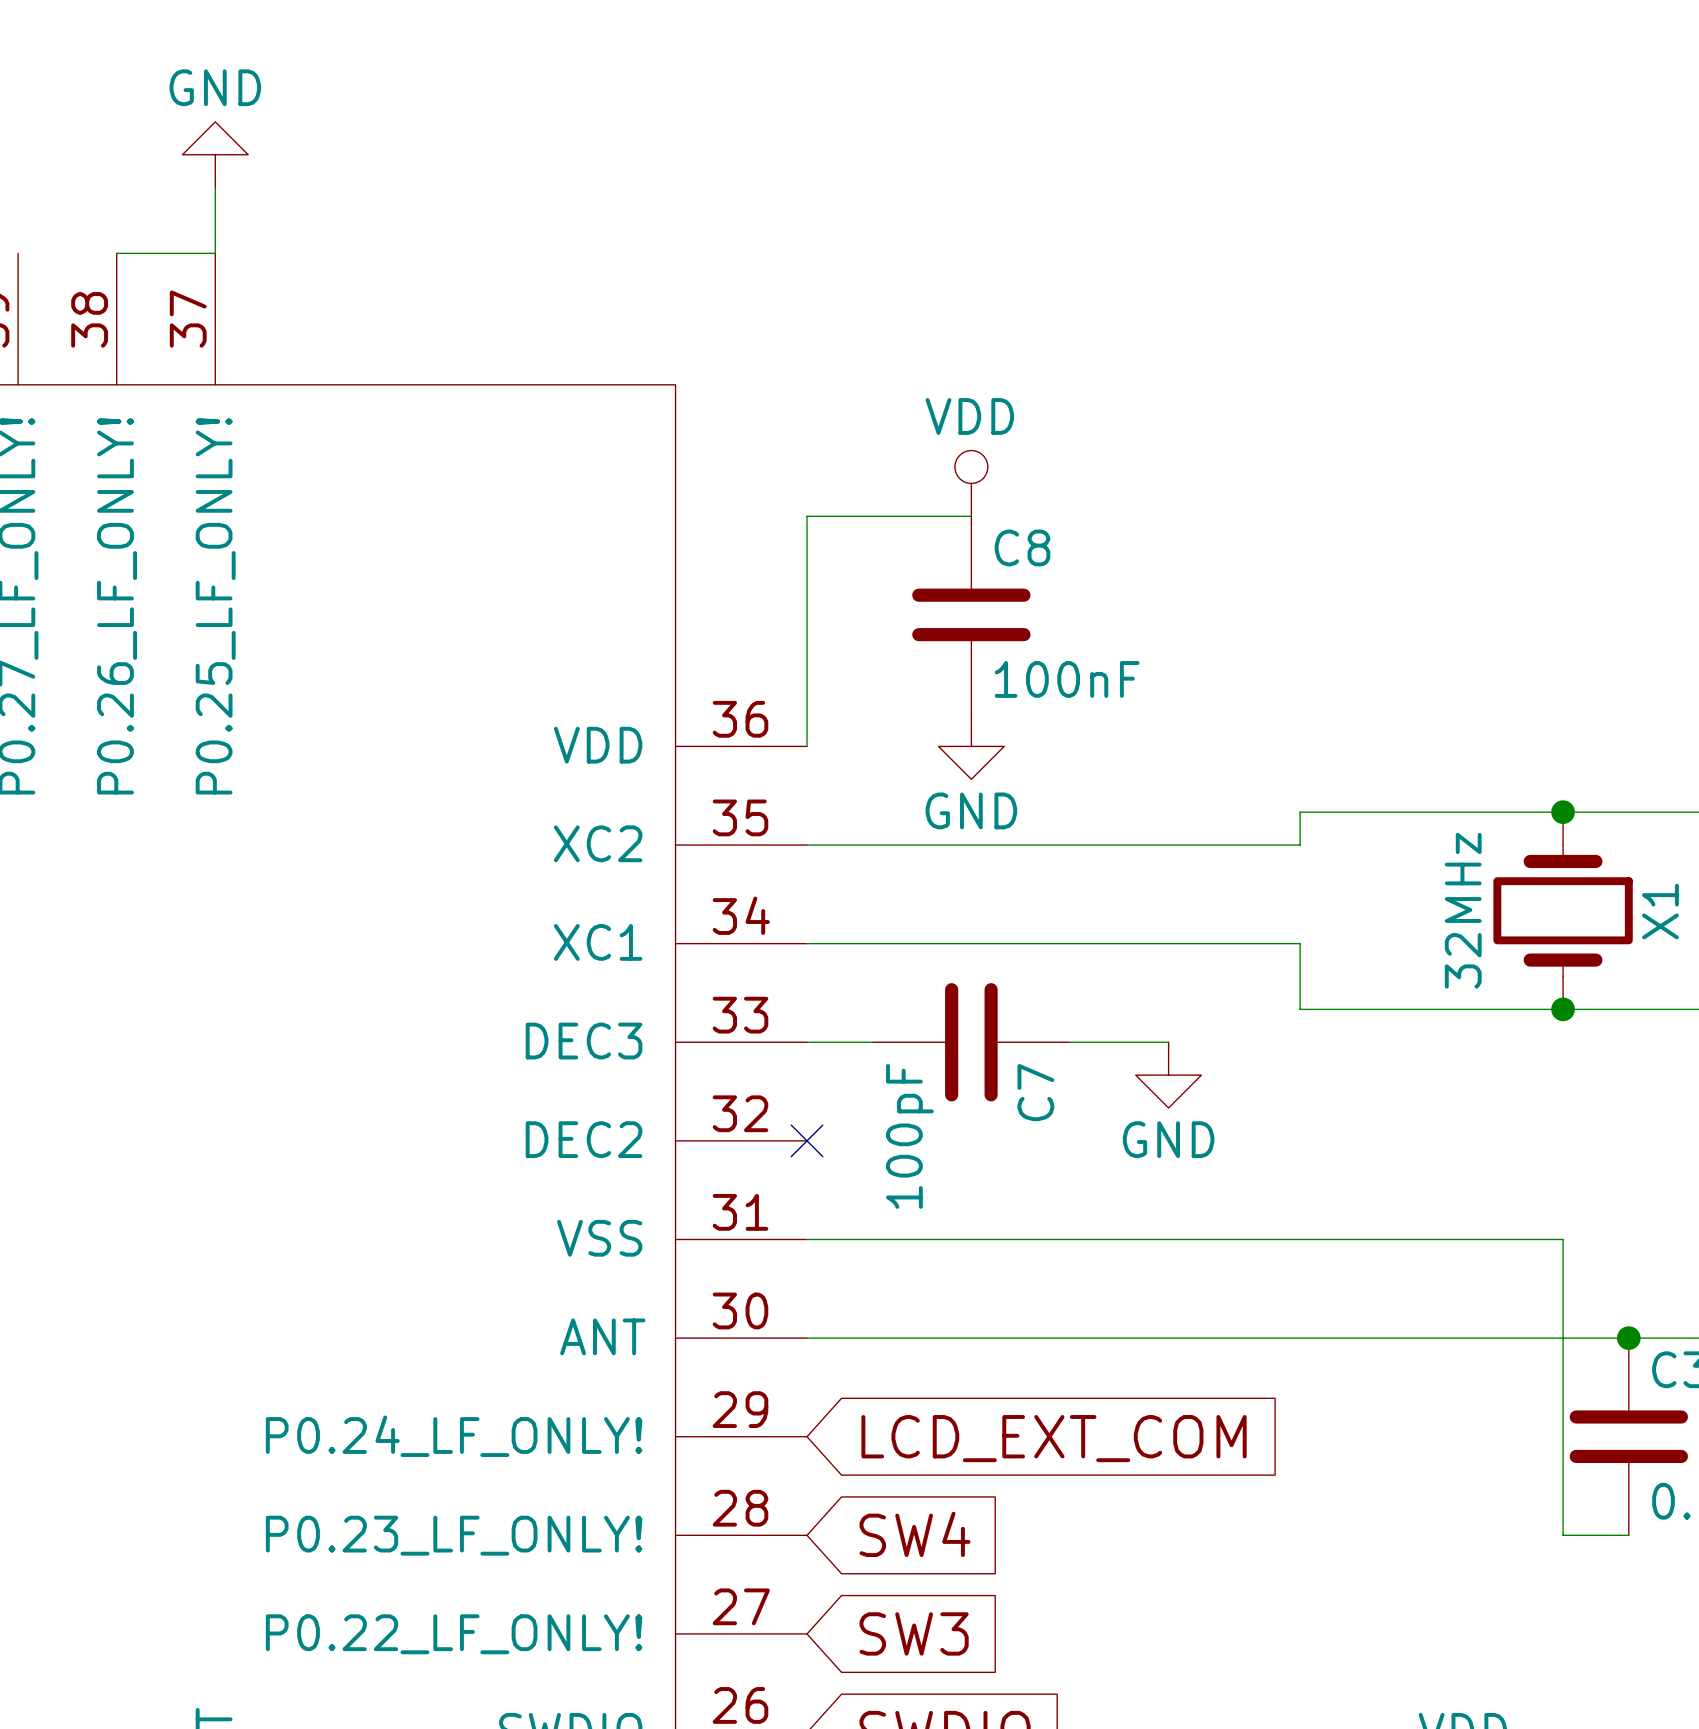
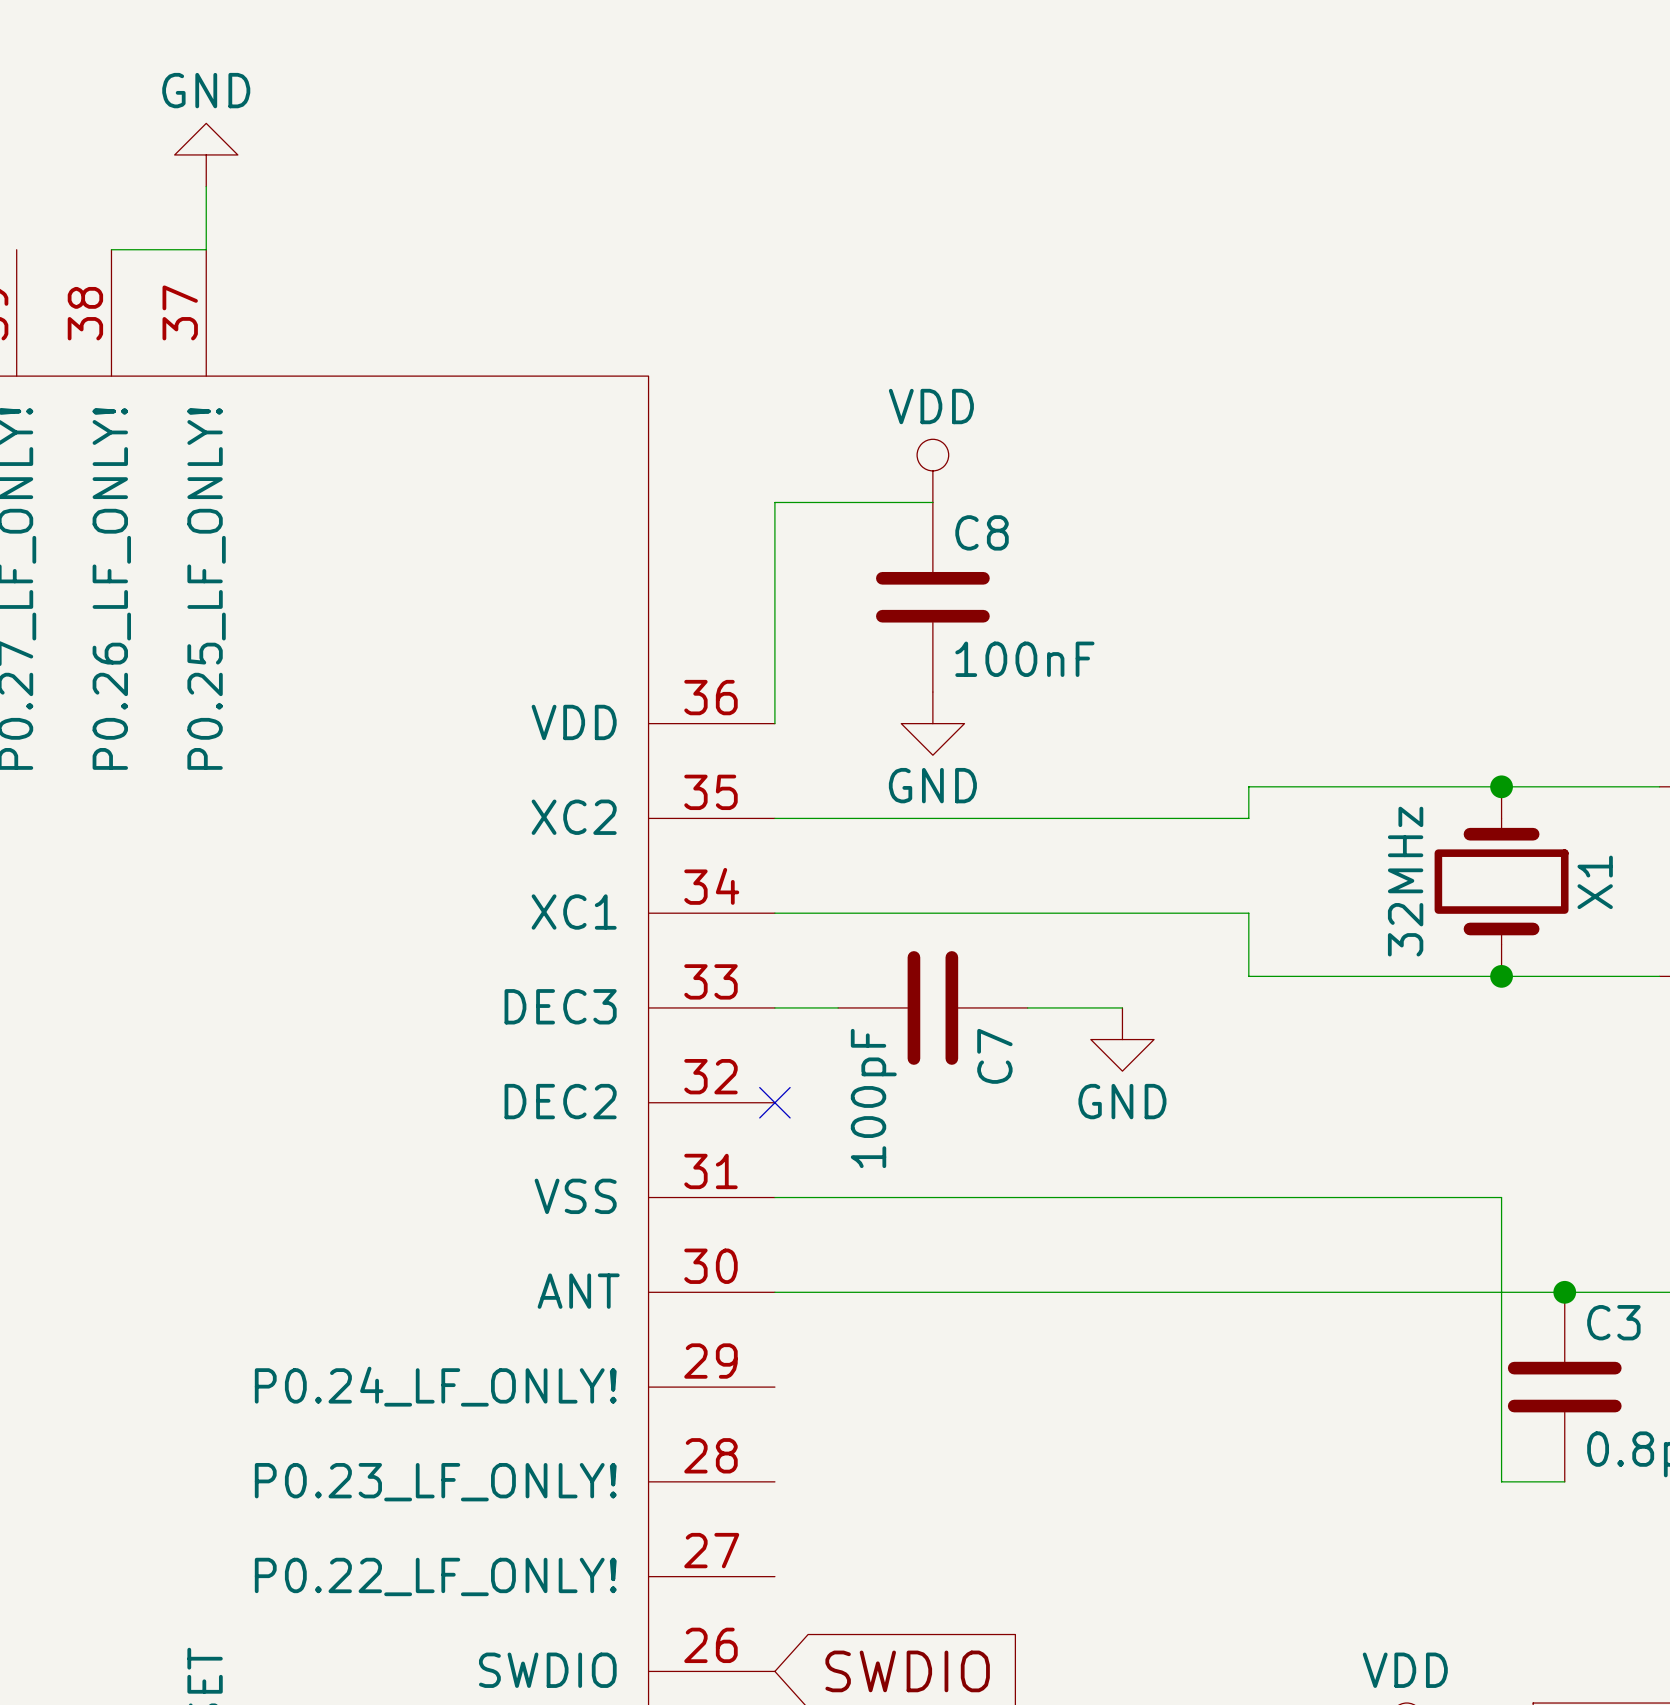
global label: LCD_EXT_COM (1054, 1438) -> none
global label: SW4 (915, 1534) -> none
global label: SW3 (914, 1633) -> none

